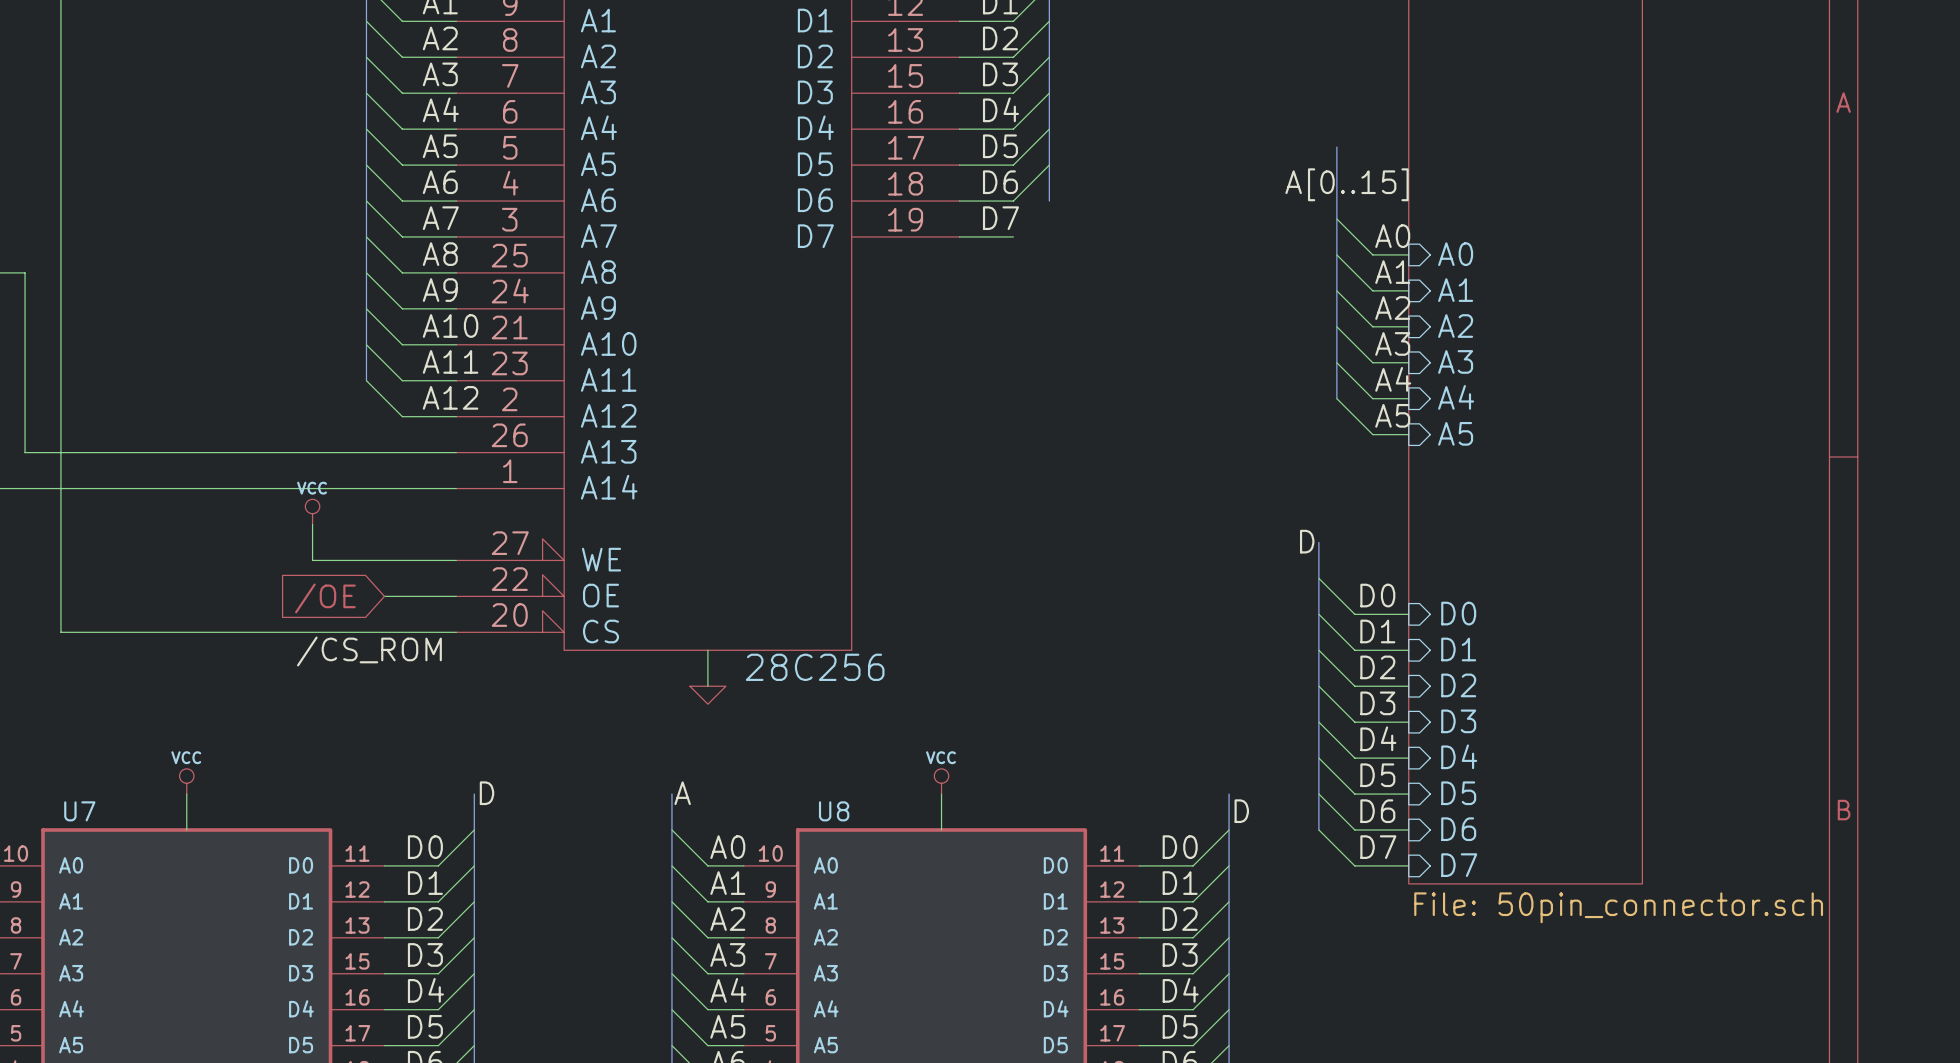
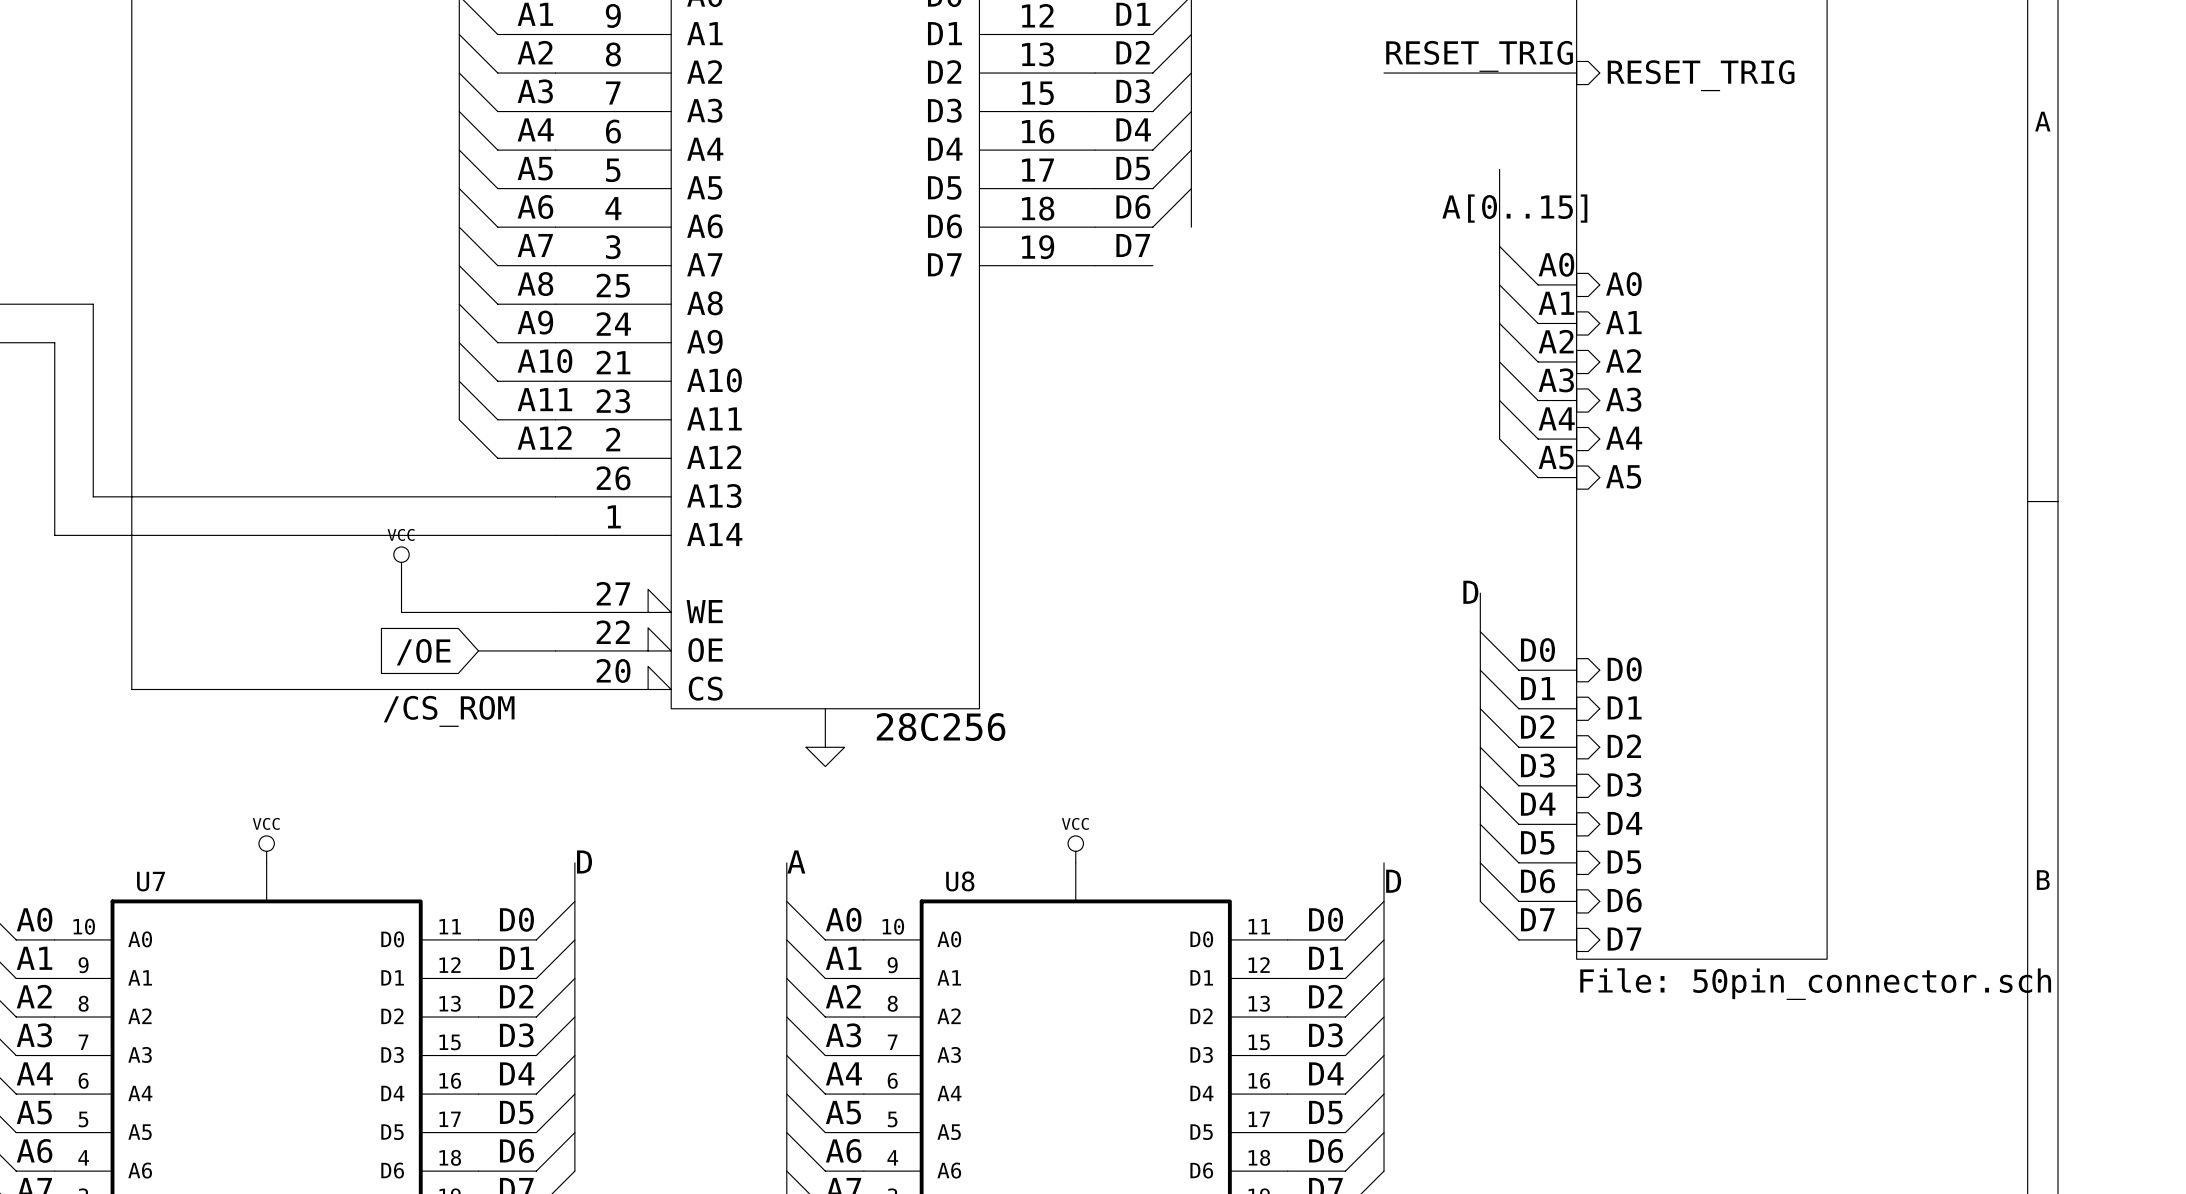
label: none -> RESET_TRIG (1479, 56)
wire: none -> (1384, 73) (1576, 73)
sheet pin: none -> RESET_TRIG (1701, 75)

